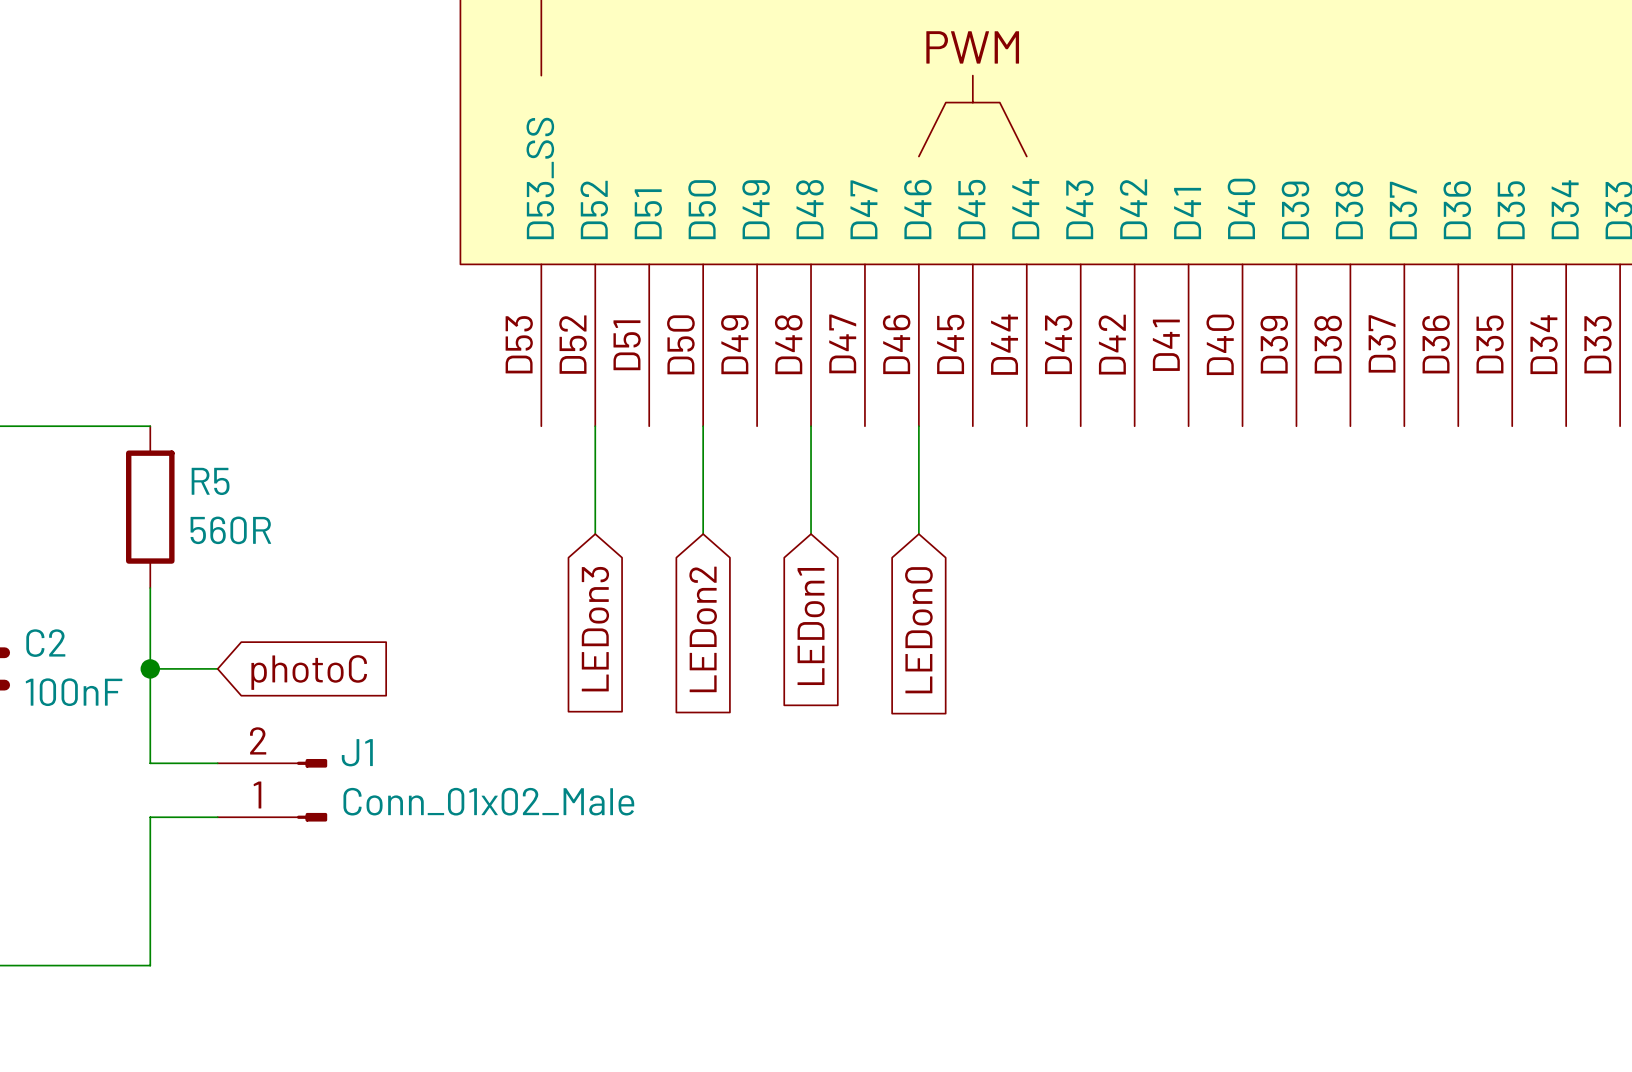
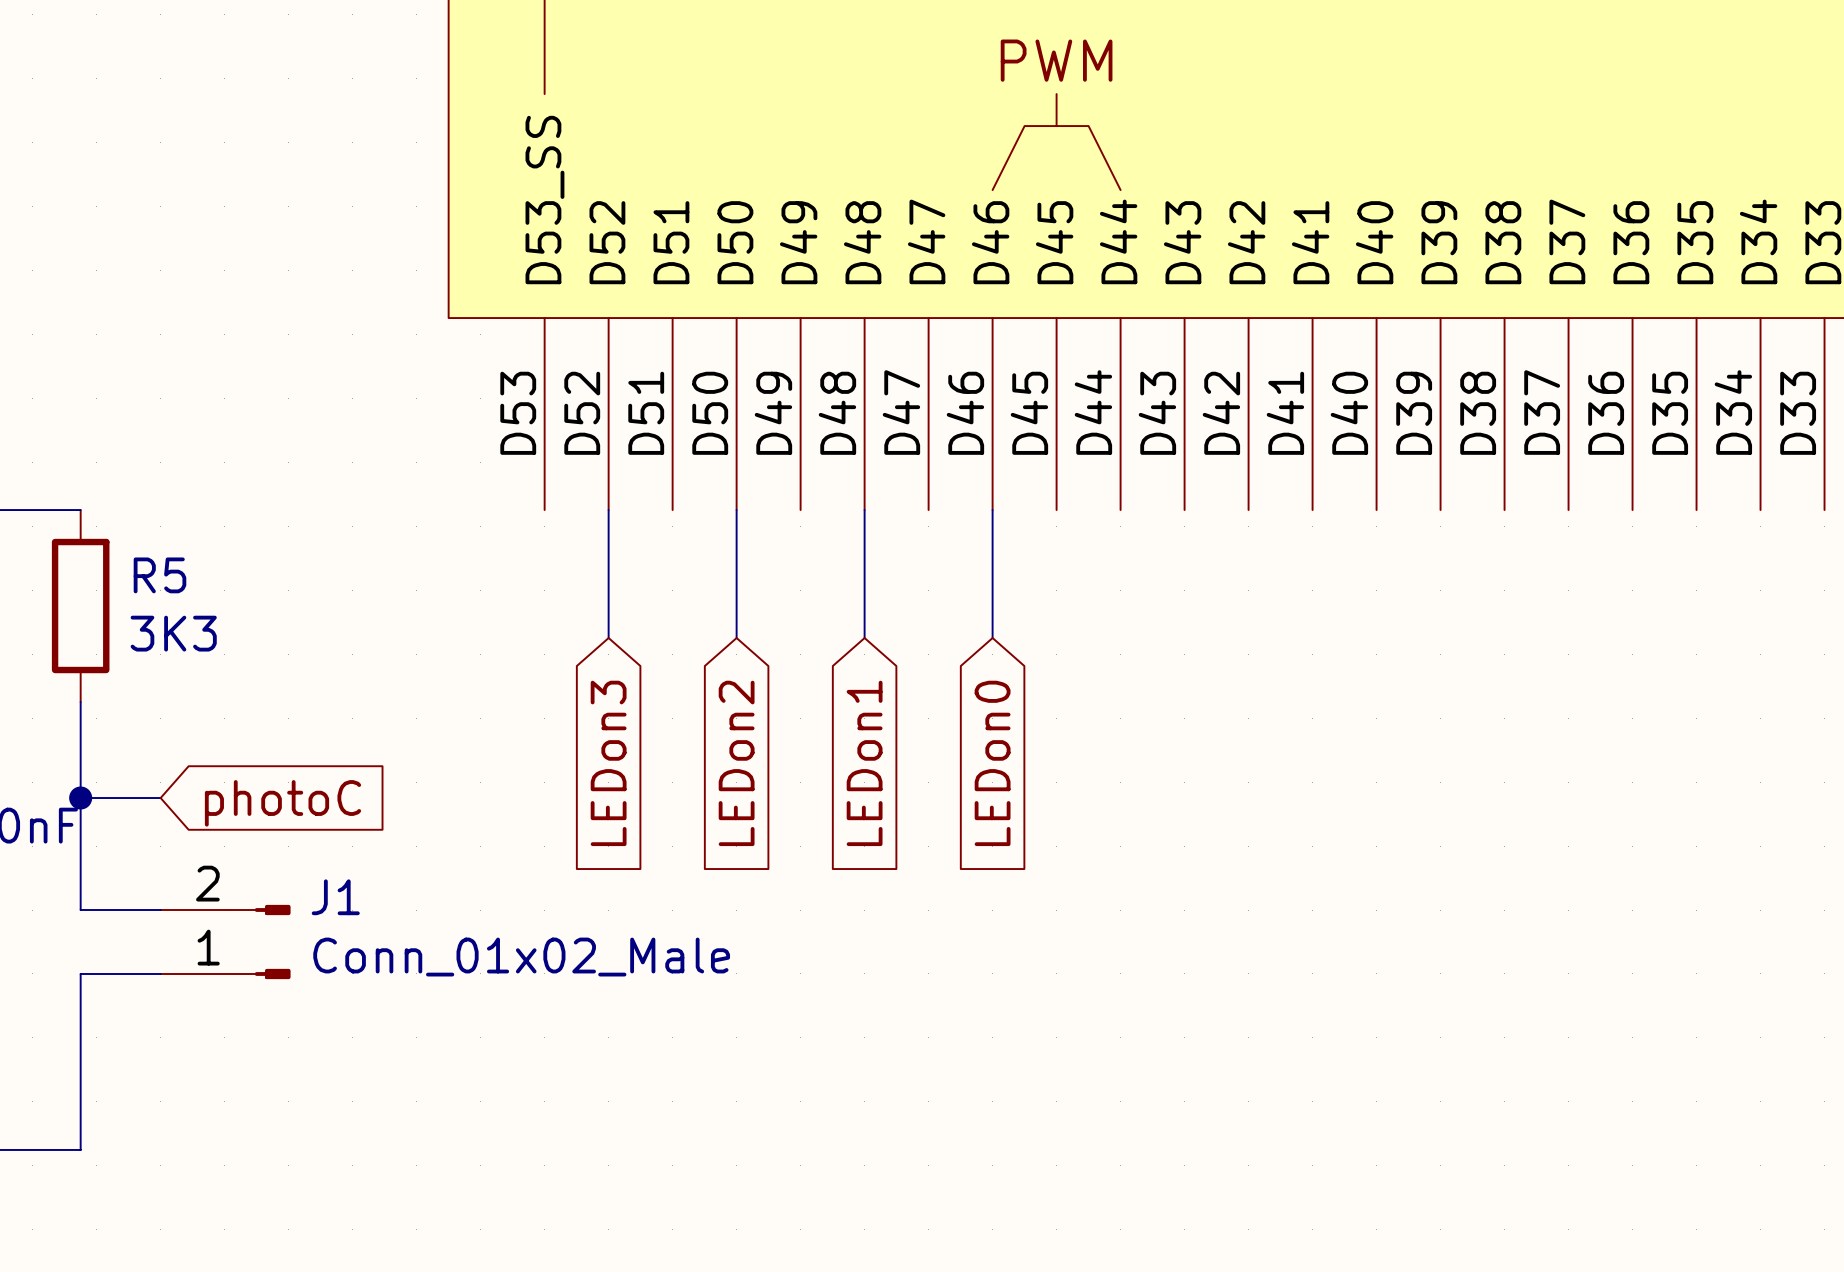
R5 value: 560R (230, 530) -> 3K3 (173, 633)

